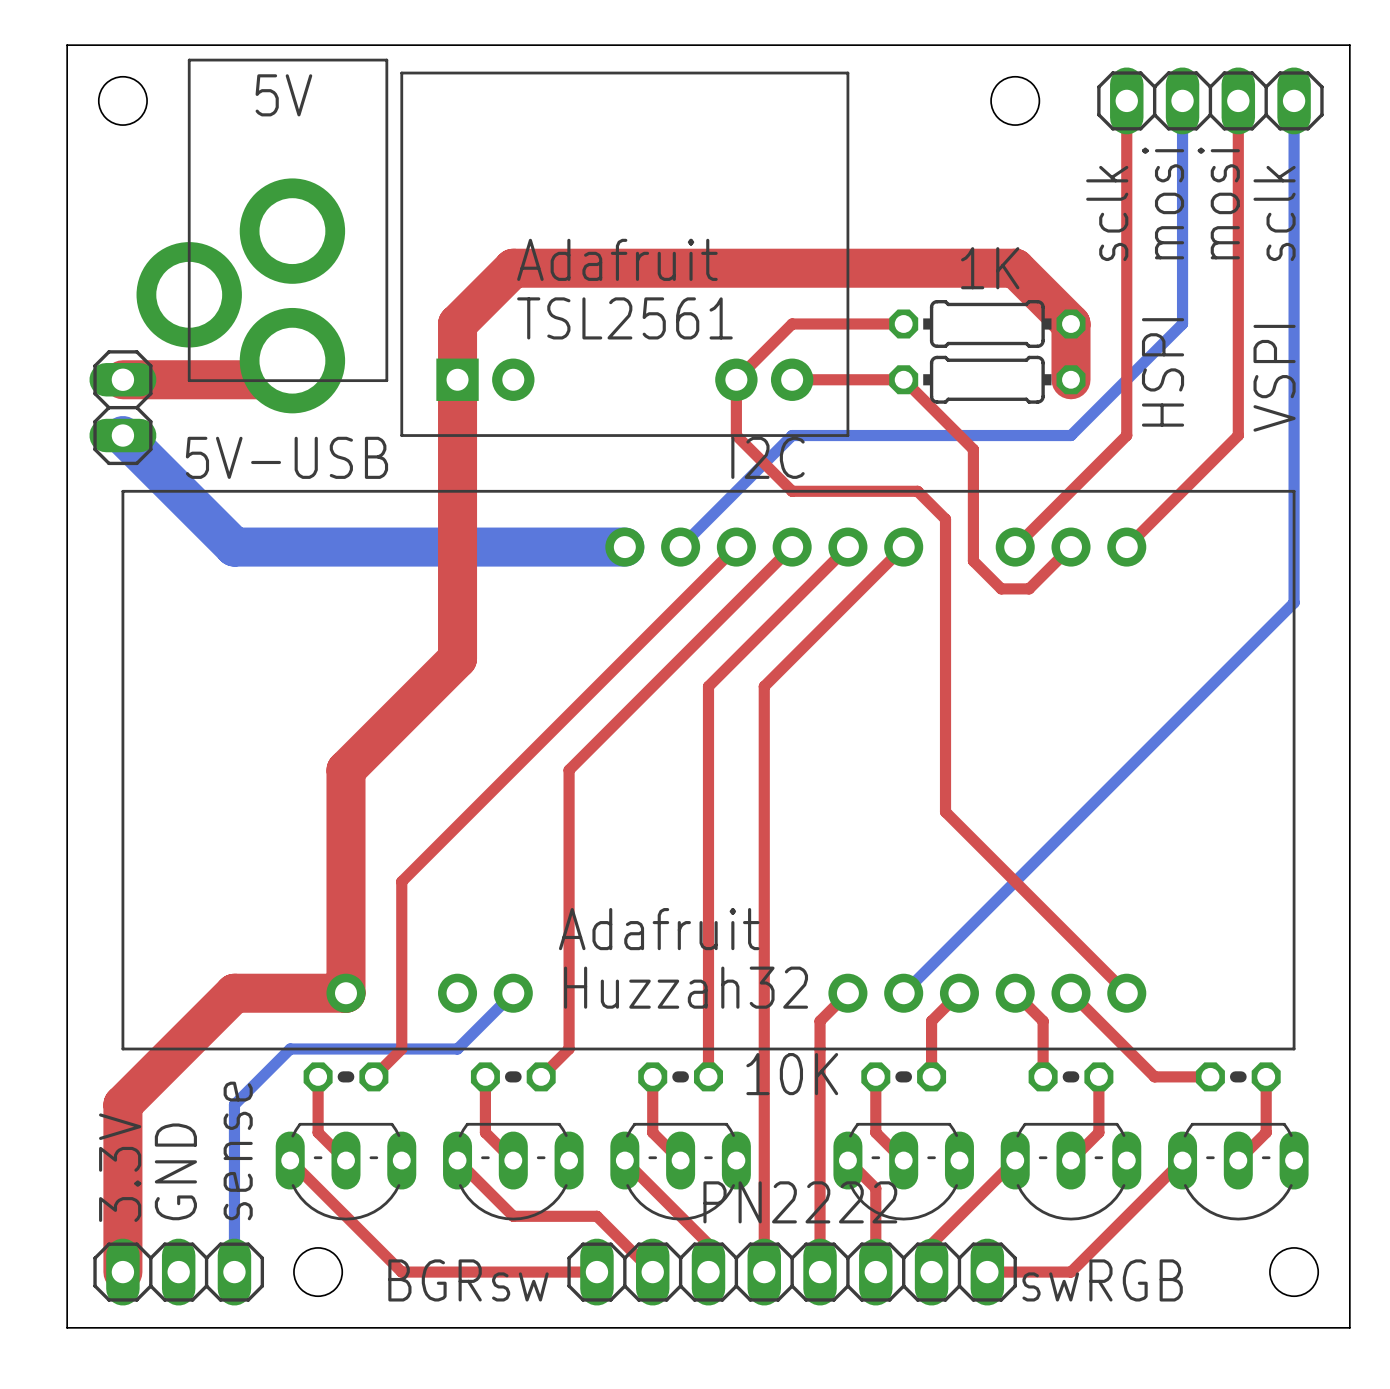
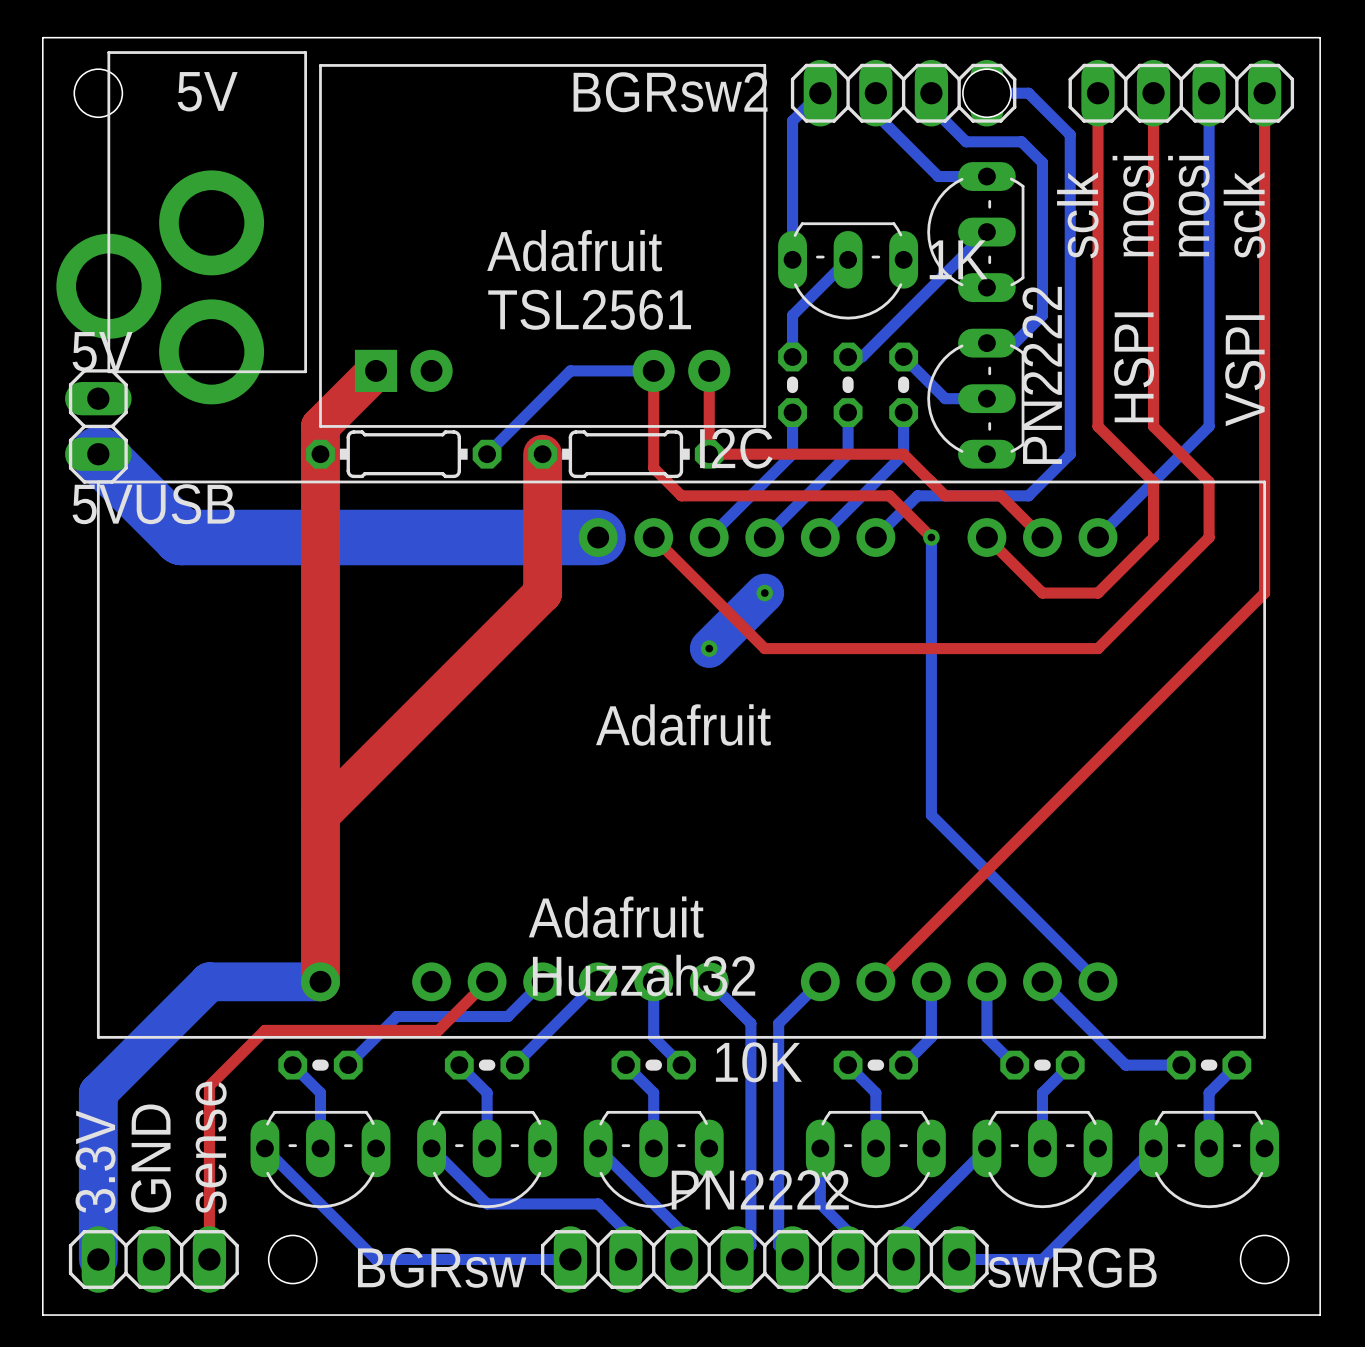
text position: 5V (283, 95) -> 5V (207, 91)
text: none -> BGRsw2 (670, 92)
bottom track: none -> (820, 93) (792, 120) (792, 259)
bottom track: none -> (875, 93) (875, 114) (938, 176) (986, 176)
part: none -> (903, 93)
bottom track: none -> (931, 93) (931, 107) (966, 141) (1021, 141) (1042, 162) (1042, 315) (1014, 343) (986, 343)
bottom track: none -> (986, 93) (1028, 93) (1070, 134) (1070, 454) (1028, 495) (917, 495) (875, 537)
top track: none -> (1153, 93) (1153, 426) (1209, 481) (1209, 537) (1098, 648) (764, 648) (653, 537)
bottom track: (1182, 100) (1182, 323) (1071, 435) (792, 435) (680, 547) -> none
top track: (1238, 100) (1238, 435) (1126, 547) -> none
bottom track: none -> (1209, 93) (1209, 426) (1098, 537)
top track: none -> (1264, 93) (1264, 593) (875, 981)
bottom track: (1294, 100) (1294, 602) (903, 993) -> none
part position: (262, 236) -> (181, 227)
part: none -> (975, 232)
bottom track: none -> (986, 232) (861, 357) (848, 357)
part position: (624, 254) -> (542, 245)
bottom track: none -> (848, 259) (792, 315) (792, 357)
part: none -> (848, 270)
top track: (903, 323) (792, 323) (736, 379) -> none
part: (987, 323) -> none
text: none -> 5V (102, 351)
top track: (292, 360) (273, 379) (122, 379) -> none
bottom track: none -> (903, 357) (945, 398) (986, 398)
text: none -> PN2222 (1042, 375)
top track: none -> (653, 370) (653, 468) (681, 495) (889, 495) (931, 537)
bottom track: none -> (653, 370) (570, 370) (487, 454)
top track: (792, 379) (903, 379) (973, 449) (973, 561) (1001, 588) (1029, 588) (1071, 547) -> (709, 426) (709, 454) (903, 454) (945, 495) (1000, 495) (1042, 537)
part: (987, 379) -> none
top track: (1071, 379) (1071, 323) (1015, 268) (513, 268) (457, 323) (457, 658) (345, 770) -> (376, 370) (320, 426) (320, 759)
part: none -> (792, 384)
part: none -> (848, 384)
part: none -> (903, 384)
part position: (122, 407) -> (98, 426)
part: none -> (975, 398)
bottom track: none -> (792, 412) (792, 454) (709, 537)
bottom track: none -> (848, 412) (848, 454) (764, 537)
bottom track: none -> (903, 412) (903, 454) (820, 537)
bottom track: (122, 435) (234, 547) -> (98, 454) (181, 537) (209, 537)
top track: (736, 435) (792, 491) (917, 491) (945, 519) (945, 811) (1126, 993) -> none
top track: (1126, 435) (1015, 547) -> (1098, 426) (1153, 481) (1153, 537) (1098, 593) (1042, 593) (986, 537)
text: 5V-USB (286, 457) -> 5VUSB (153, 504)
part: none -> (403, 454)
top track: none -> (542, 454) (542, 593) (320, 815)
part: none -> (625, 454)
part footprint: [121, 489, 1296, 1051] -> [96, 480, 1267, 1039]
bottom track width: thin (234, 547) (624, 547) -> thick (209, 537) (598, 537)
top track: (736, 547) (401, 881) (401, 1049) (373, 1076) -> none
top track: (792, 547) (569, 770) (569, 1049) (541, 1076) -> none
top track: (847, 547) (708, 686) (708, 1076) -> none
top track: (903, 547) (764, 686) (764, 1272) -> none
bottom track: none -> (931, 537) (931, 815) (1098, 981)
via: none -> (931, 537)
bottom track: none -> (764, 593) (709, 648)
via: none -> (764, 593)
via: none -> (709, 648)
text: none -> Adafruit (683, 724)
top track: (345, 993) (234, 993) (122, 1104) (122, 1272) -> none
bottom track: none -> (320, 981) (209, 981) (98, 1092) (98, 1259)
top track: none -> (487, 981) (438, 1030) (264, 1030) (209, 1085) (209, 1259)
bottom track: (513, 993) (457, 1049) (290, 1049) (234, 1104) (234, 1272) -> none
bottom track: none -> (542, 981) (507, 1016) (396, 1016) (348, 1065)
bottom track: none -> (598, 981) (514, 1065)
bottom track: none -> (653, 981) (653, 1037) (681, 1065)
bottom track: none -> (709, 981) (750, 1023) (750, 1245) (737, 1259)
top track: (847, 993) (820, 1021) (820, 1272) -> none
bottom track: none -> (820, 981) (778, 1023) (778, 1245) (792, 1259)
top track: (959, 993) (931, 1021) (931, 1076) -> none
bottom track: none -> (931, 981) (931, 1037) (903, 1065)
top track: (1015, 993) (1043, 1021) (1043, 1076) -> none
bottom track: none -> (986, 981) (986, 1037) (1014, 1065)
top track: (1071, 993) (1154, 1076) (1210, 1076) -> none
bottom track: none -> (1042, 981) (1125, 1065) (1181, 1065)
top track: (318, 1076) (318, 1132) (345, 1160) -> none
bottom track: none -> (292, 1065) (320, 1092) (320, 1148)
top track: (485, 1076) (485, 1132) (513, 1160) -> none
bottom track: none -> (459, 1065) (487, 1092) (487, 1148)
top track: (652, 1076) (652, 1132) (680, 1160) -> none
bottom track: none -> (625, 1065) (653, 1092) (653, 1148)
top track: (875, 1076) (875, 1132) (903, 1160) -> none
bottom track: none -> (848, 1065) (875, 1092) (875, 1148)
top track: (1098, 1076) (1098, 1132) (1071, 1160) -> none
bottom track: none -> (1070, 1065) (1042, 1092) (1042, 1148)
top track: (1266, 1076) (1266, 1132) (1238, 1160) -> none
bottom track: none -> (1236, 1065) (1209, 1092) (1209, 1148)
top track: (290, 1160) (401, 1272) (596, 1272) -> none
bottom track: none -> (264, 1148) (376, 1259) (570, 1259)
top track: (457, 1160) (513, 1216) (596, 1216) (652, 1272) -> none
bottom track: none -> (431, 1148) (487, 1203) (598, 1203) (625, 1231) (625, 1259)
top track: (624, 1160) (708, 1244) (708, 1272) -> none
bottom track: none -> (598, 1148) (681, 1231) (681, 1259)
top track: (847, 1160) (875, 1188) (875, 1272) -> none
bottom track: none -> (820, 1148) (820, 1203) (848, 1231) (848, 1259)
top track: (1015, 1160) (931, 1244) (931, 1272) -> none
bottom track: none -> (986, 1148) (903, 1231) (903, 1259)
top track: (1182, 1160) (1071, 1272) (987, 1272) -> none
bottom track: none -> (1153, 1148) (1042, 1259) (959, 1259)

